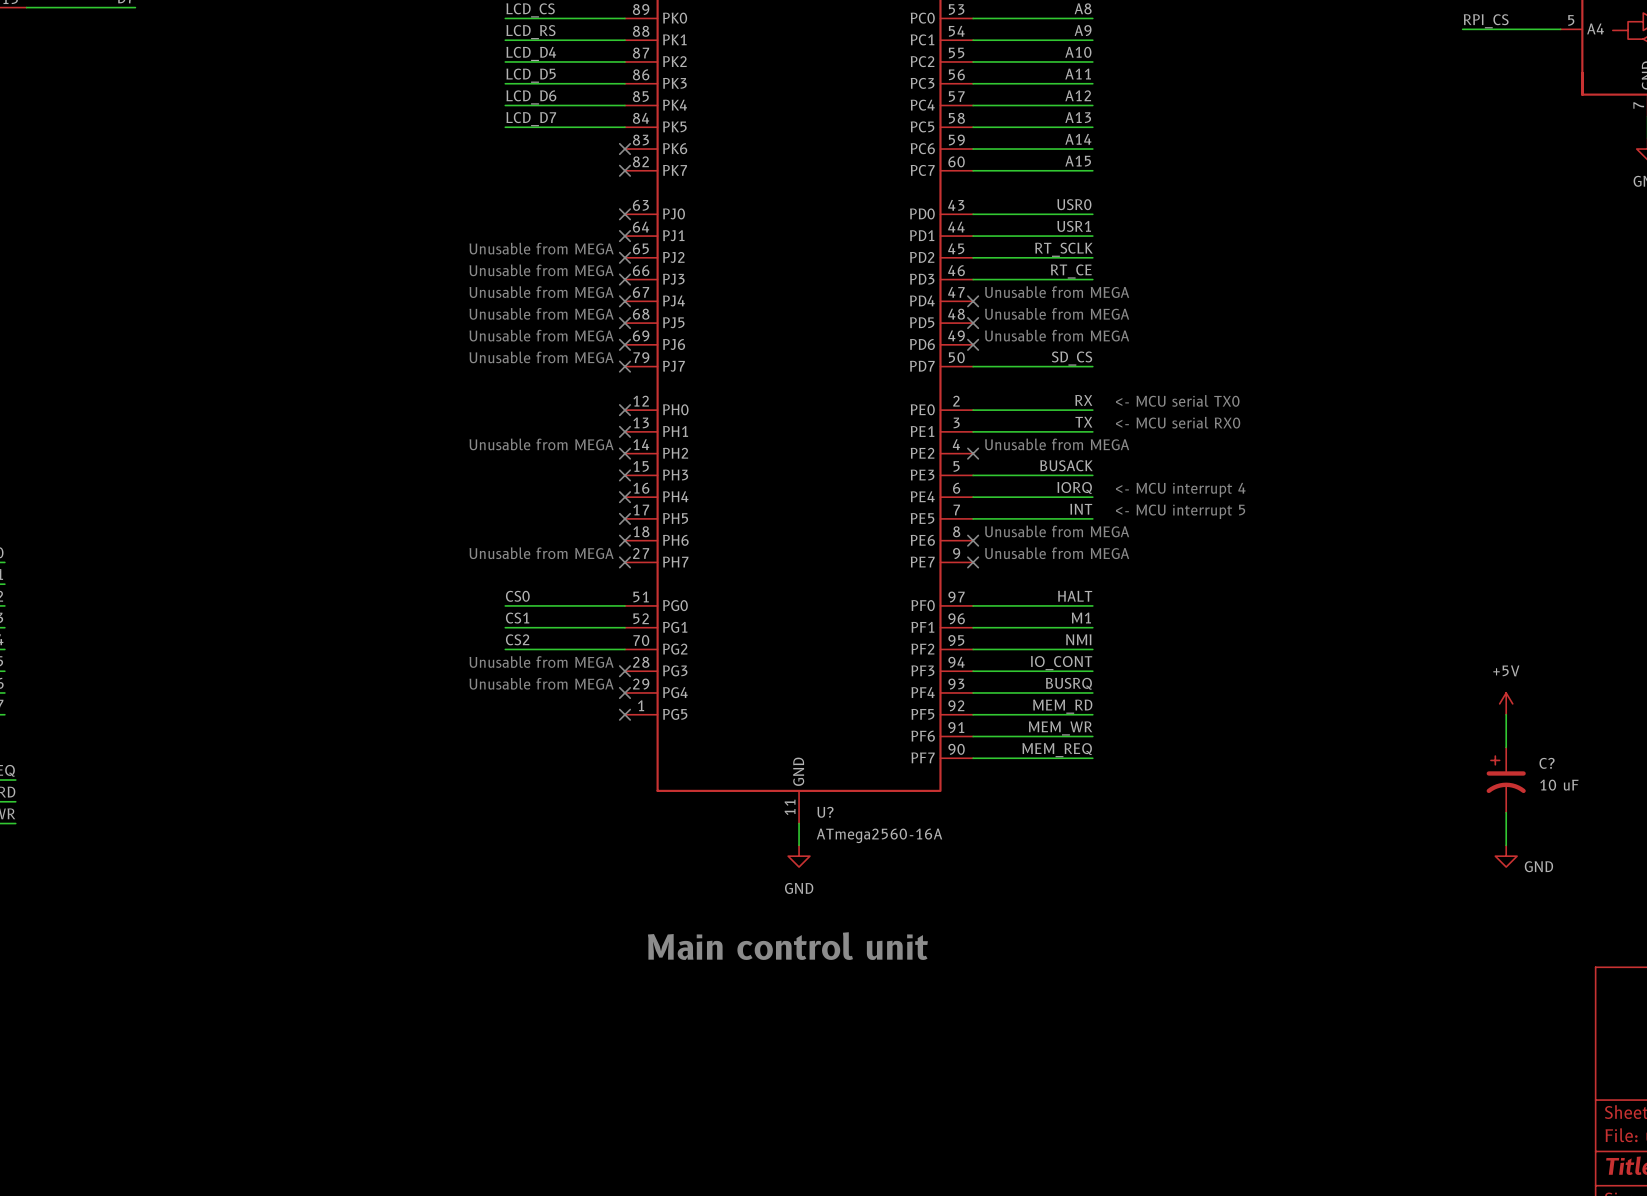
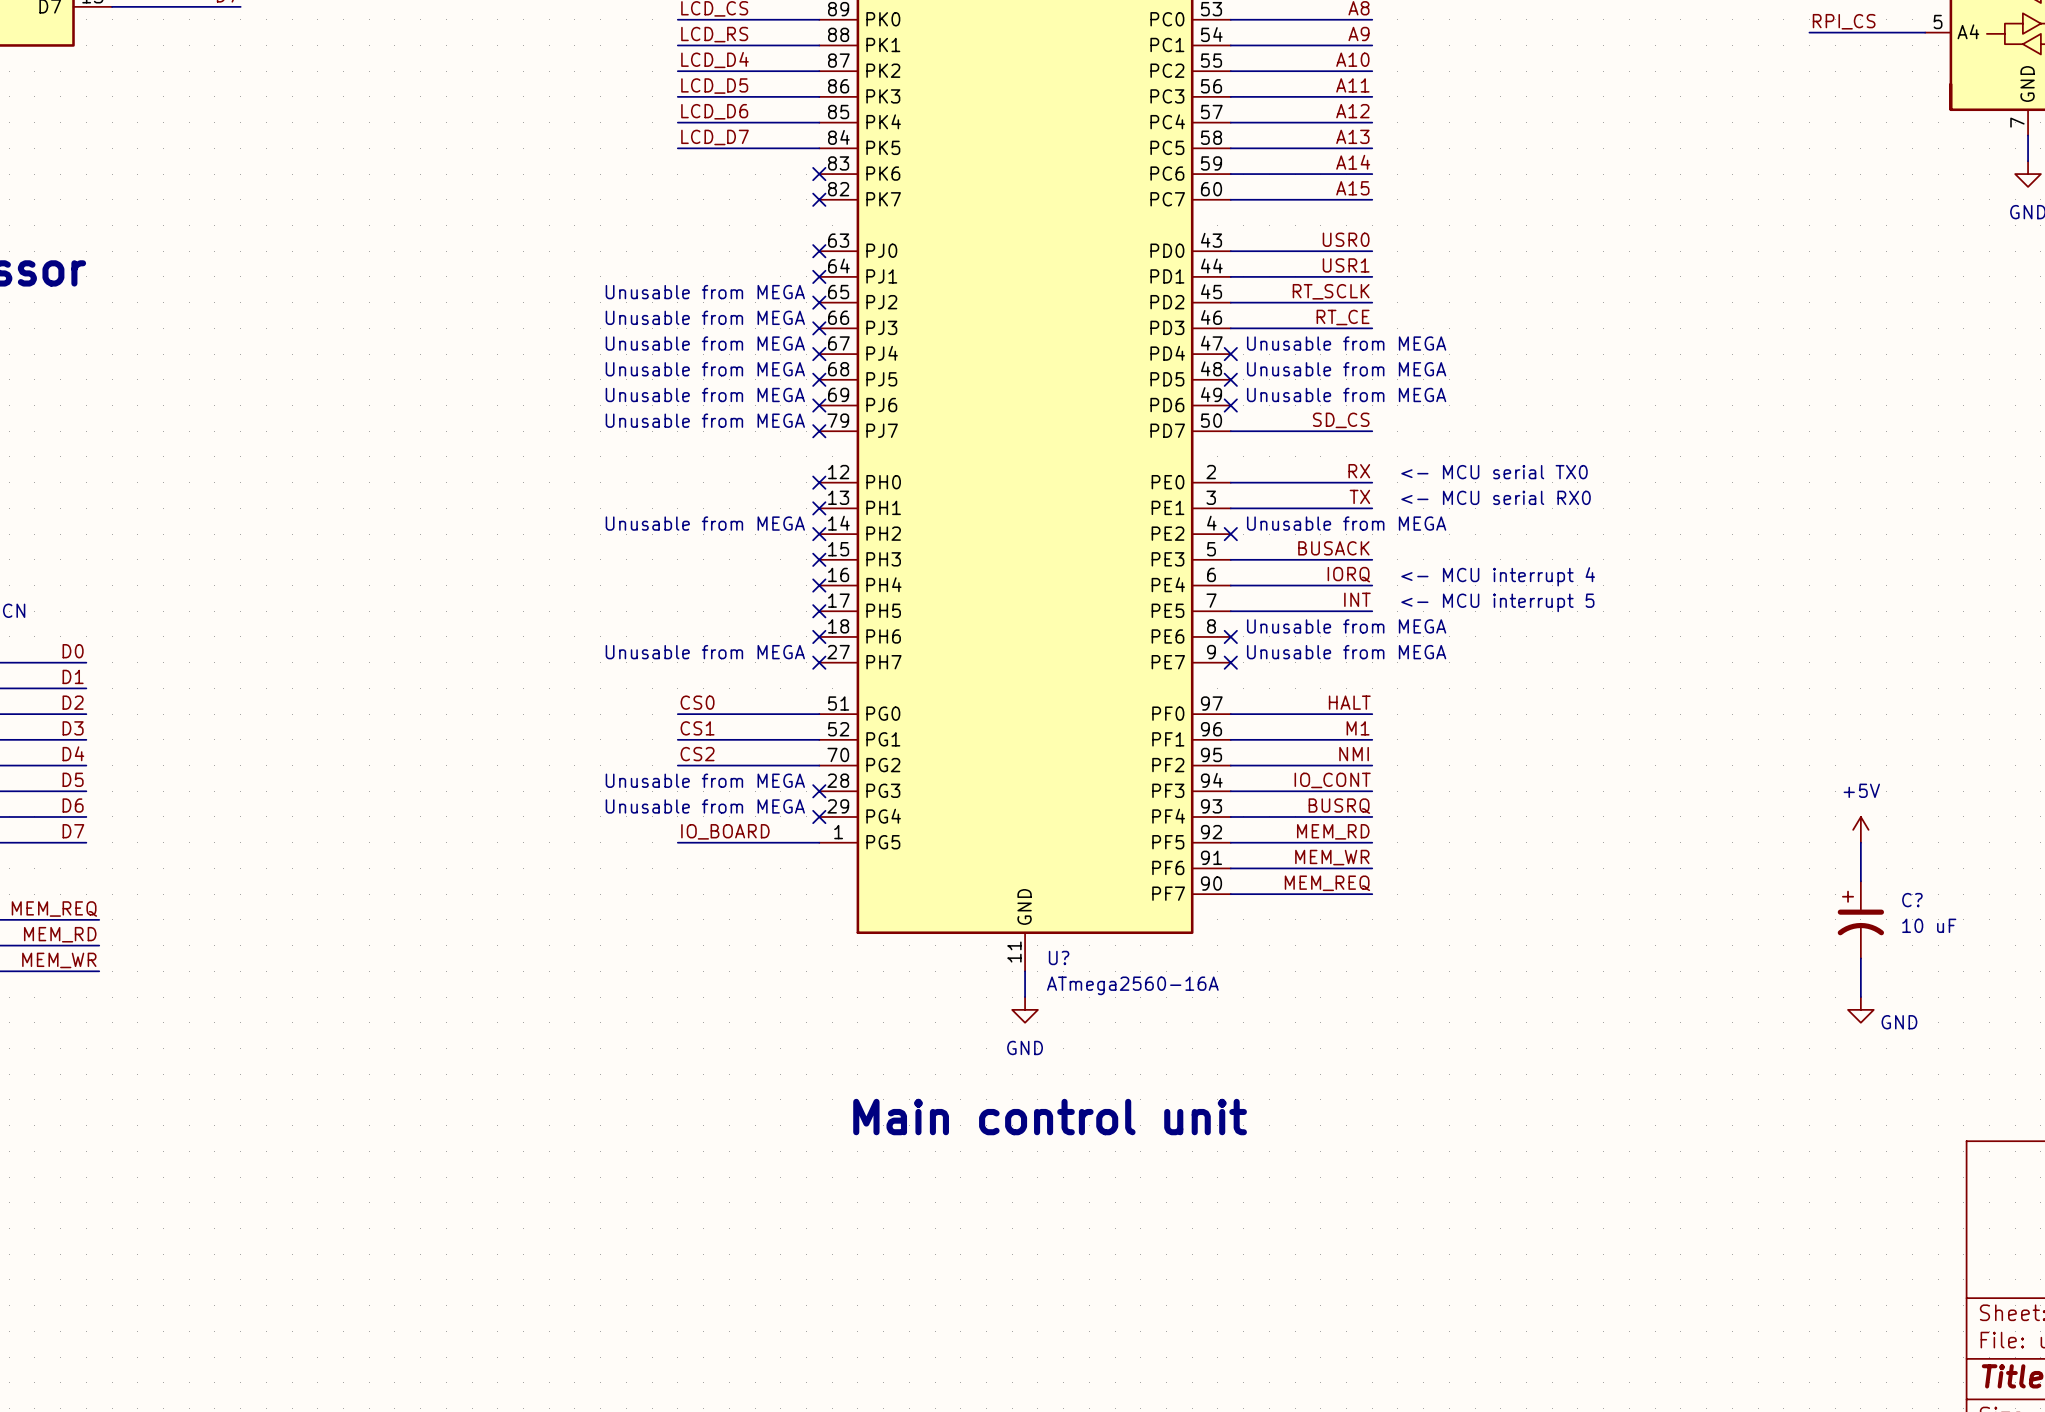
label: none -> IO_BOARD (725, 831)
wire: none -> (677, 842) (819, 842)
no-connect mark: (624, 714) -> none

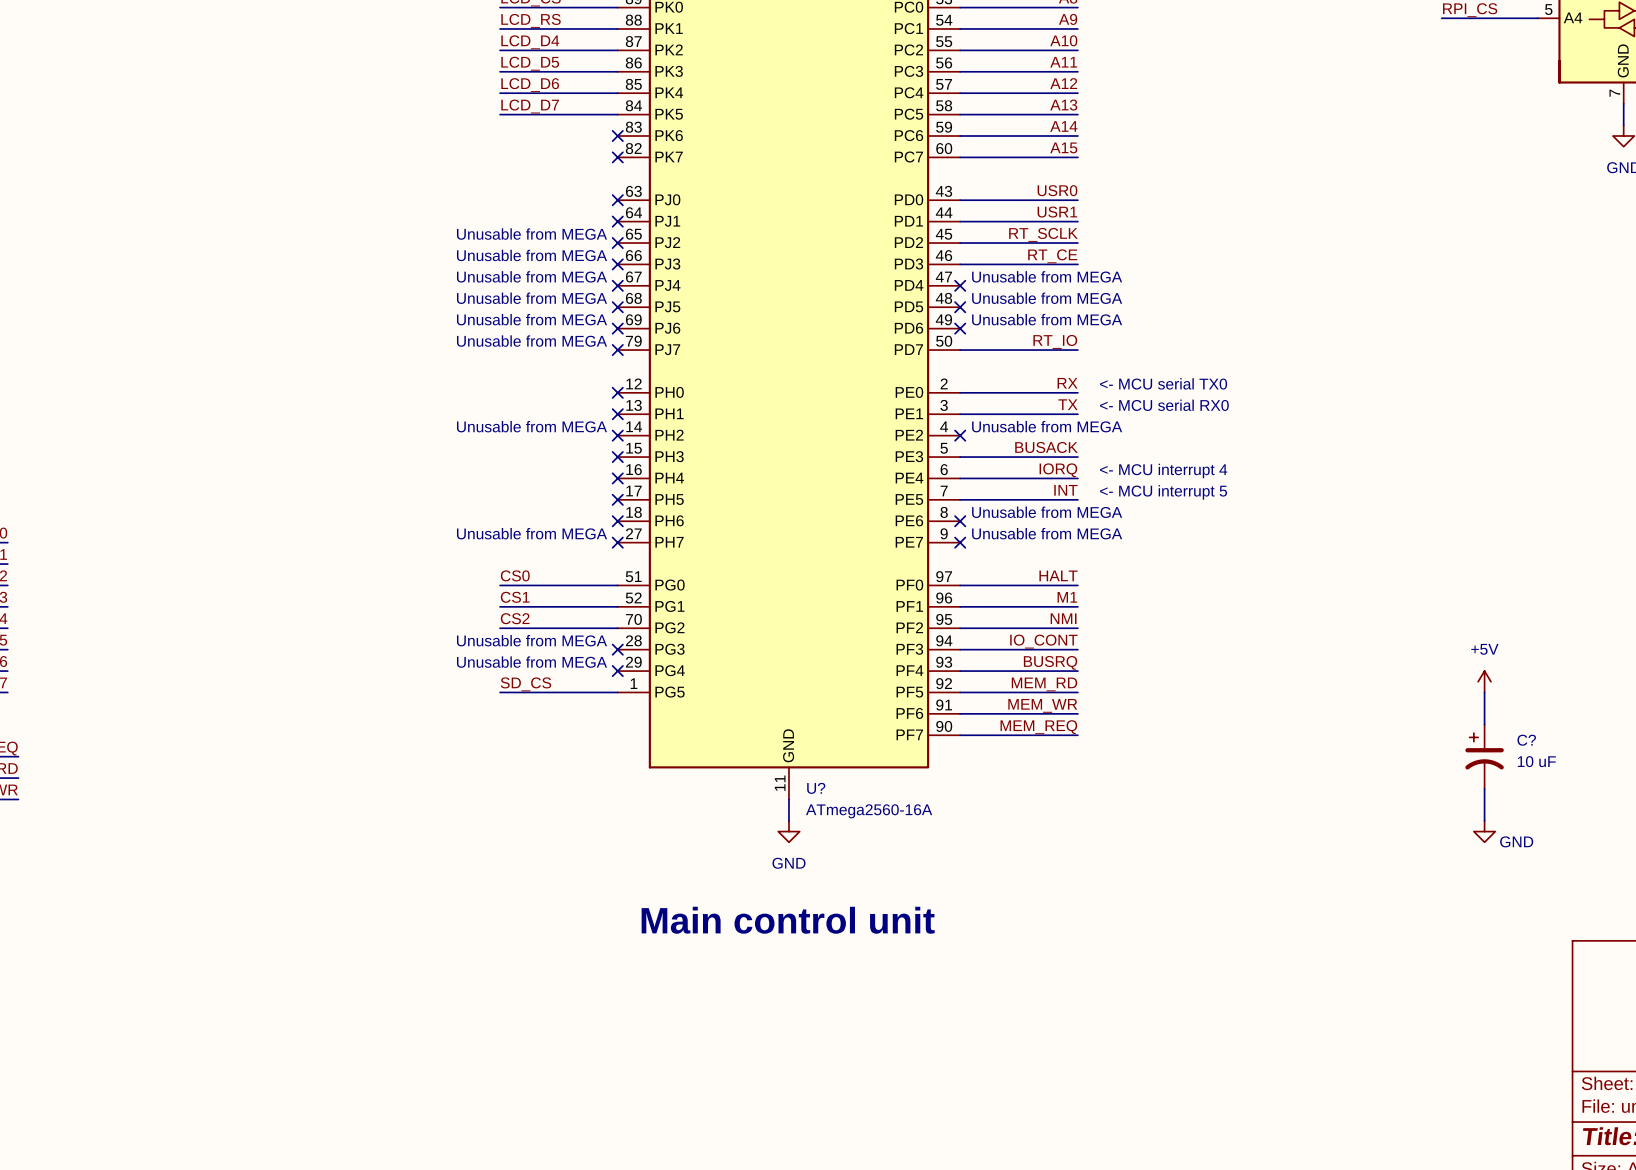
label: SD_CS (1341, 420) -> RT_IO (1055, 341)
label: IO_BOARD (725, 831) -> SD_CS (525, 684)

